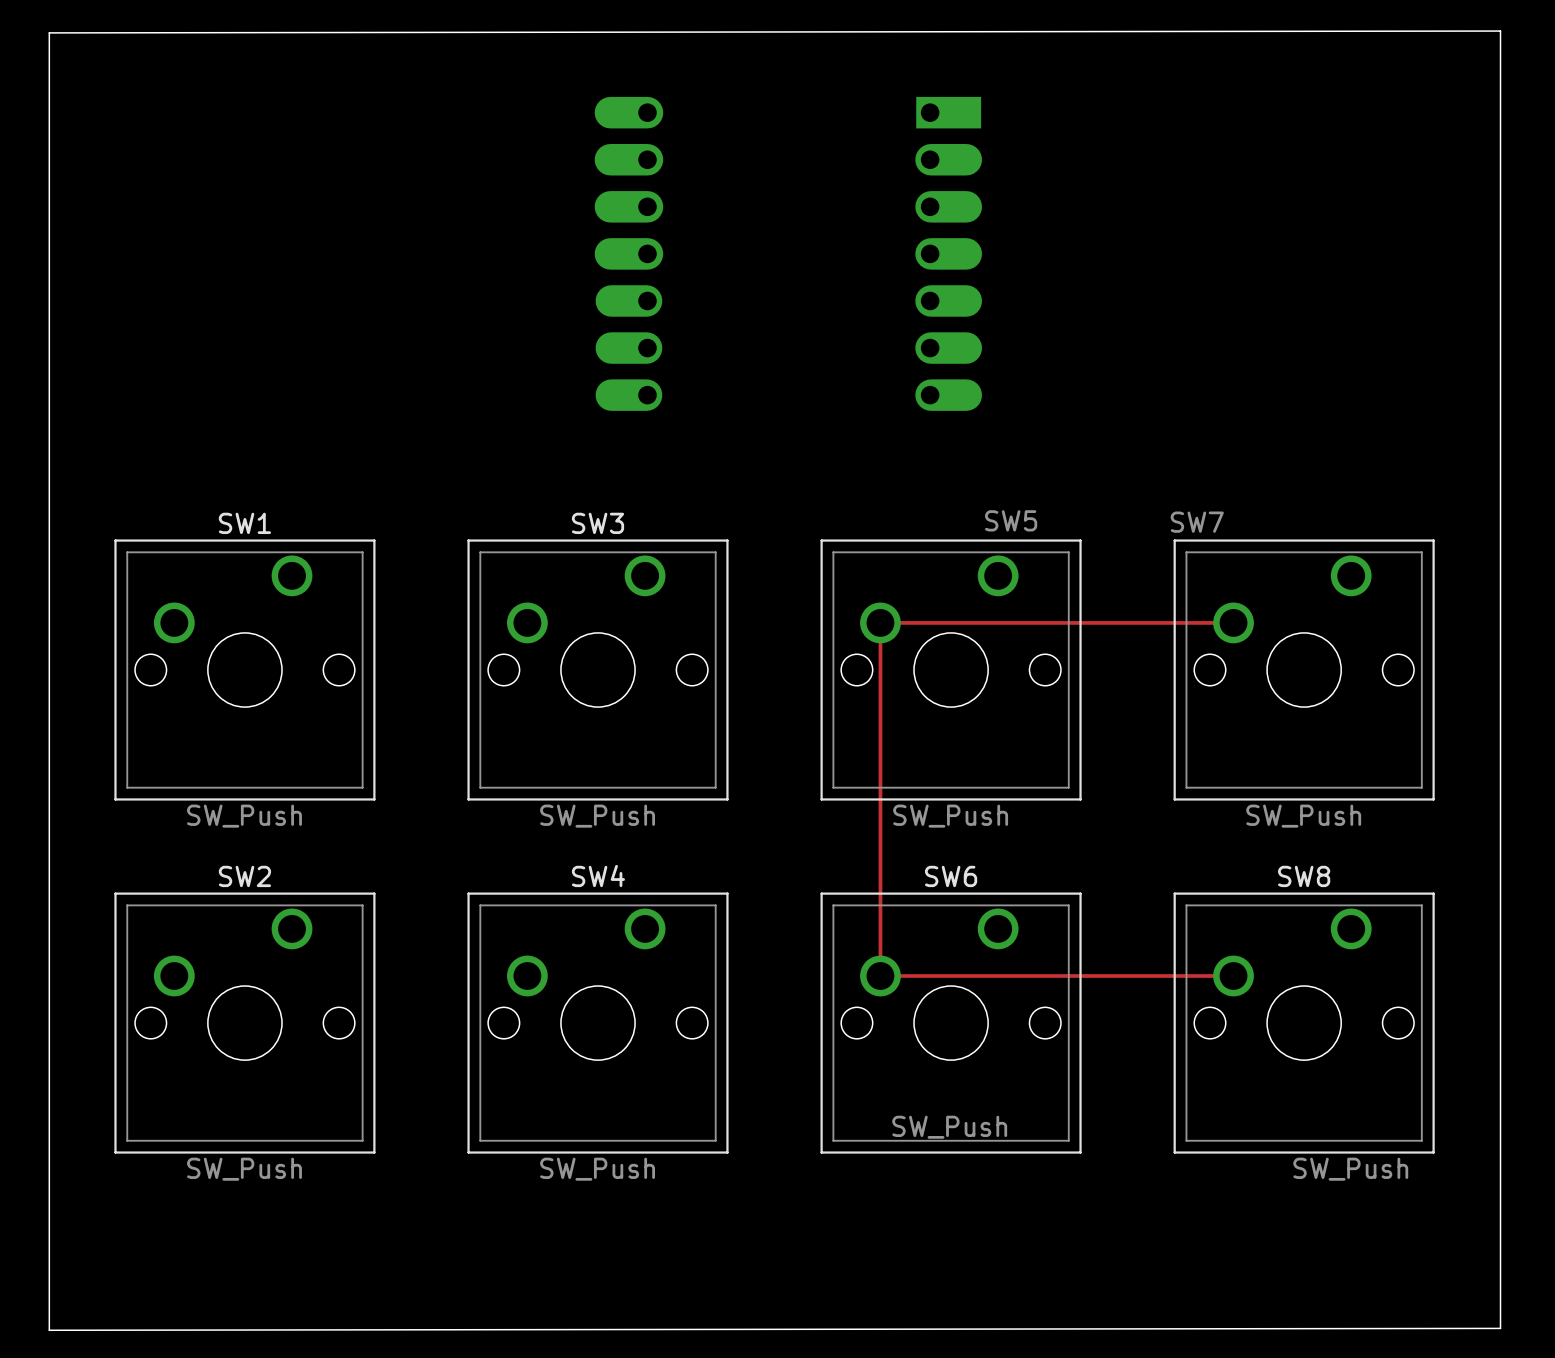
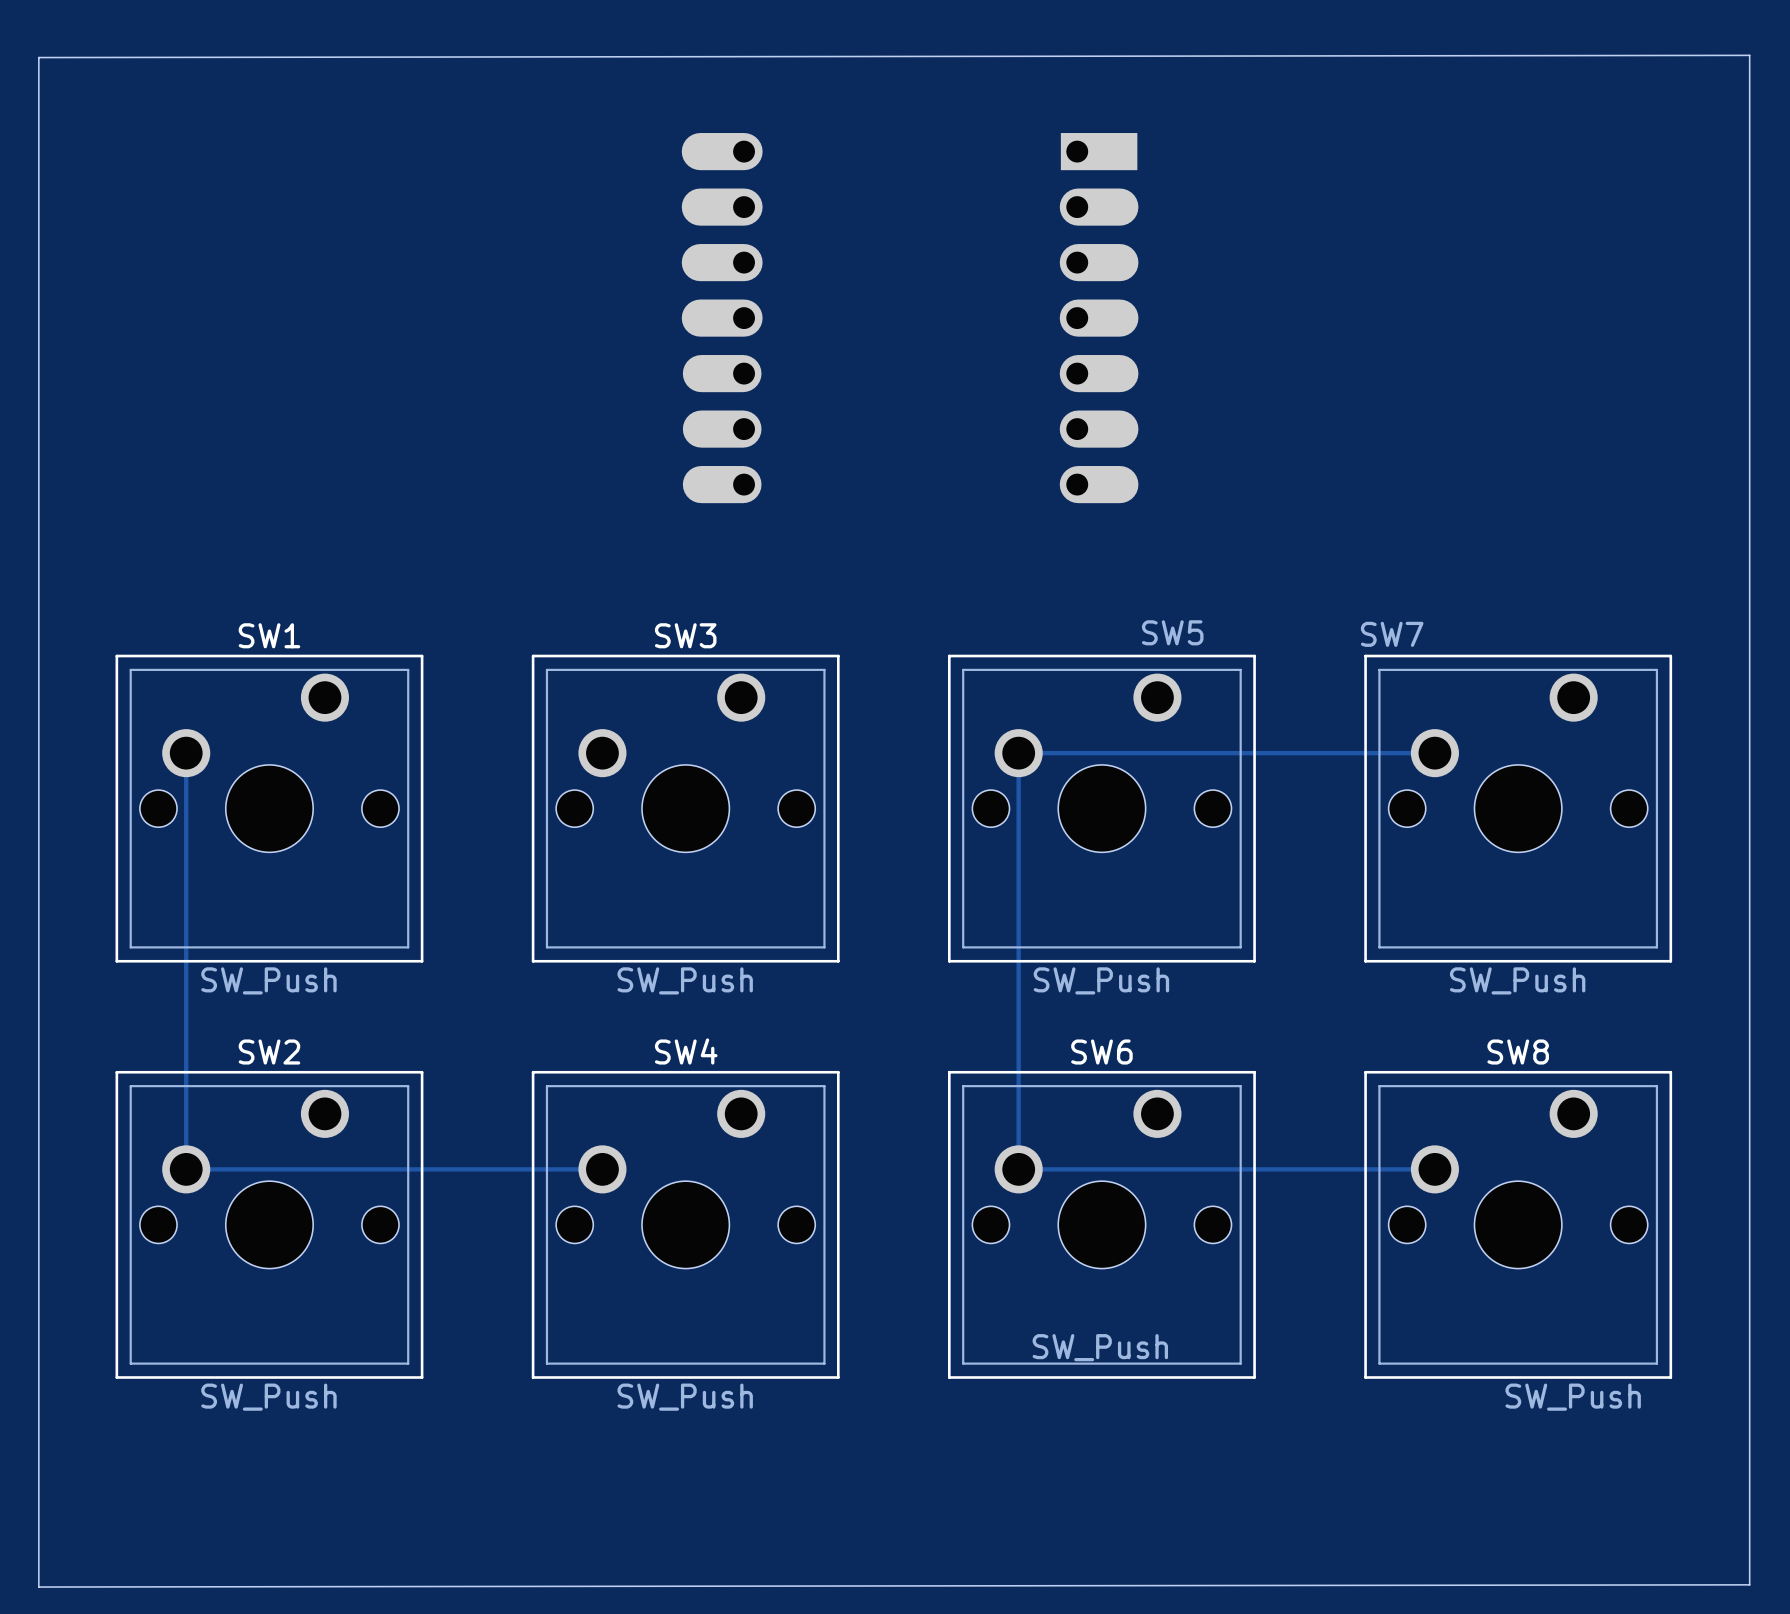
track: none -> (186, 753) (186, 1169) (602, 1169)

